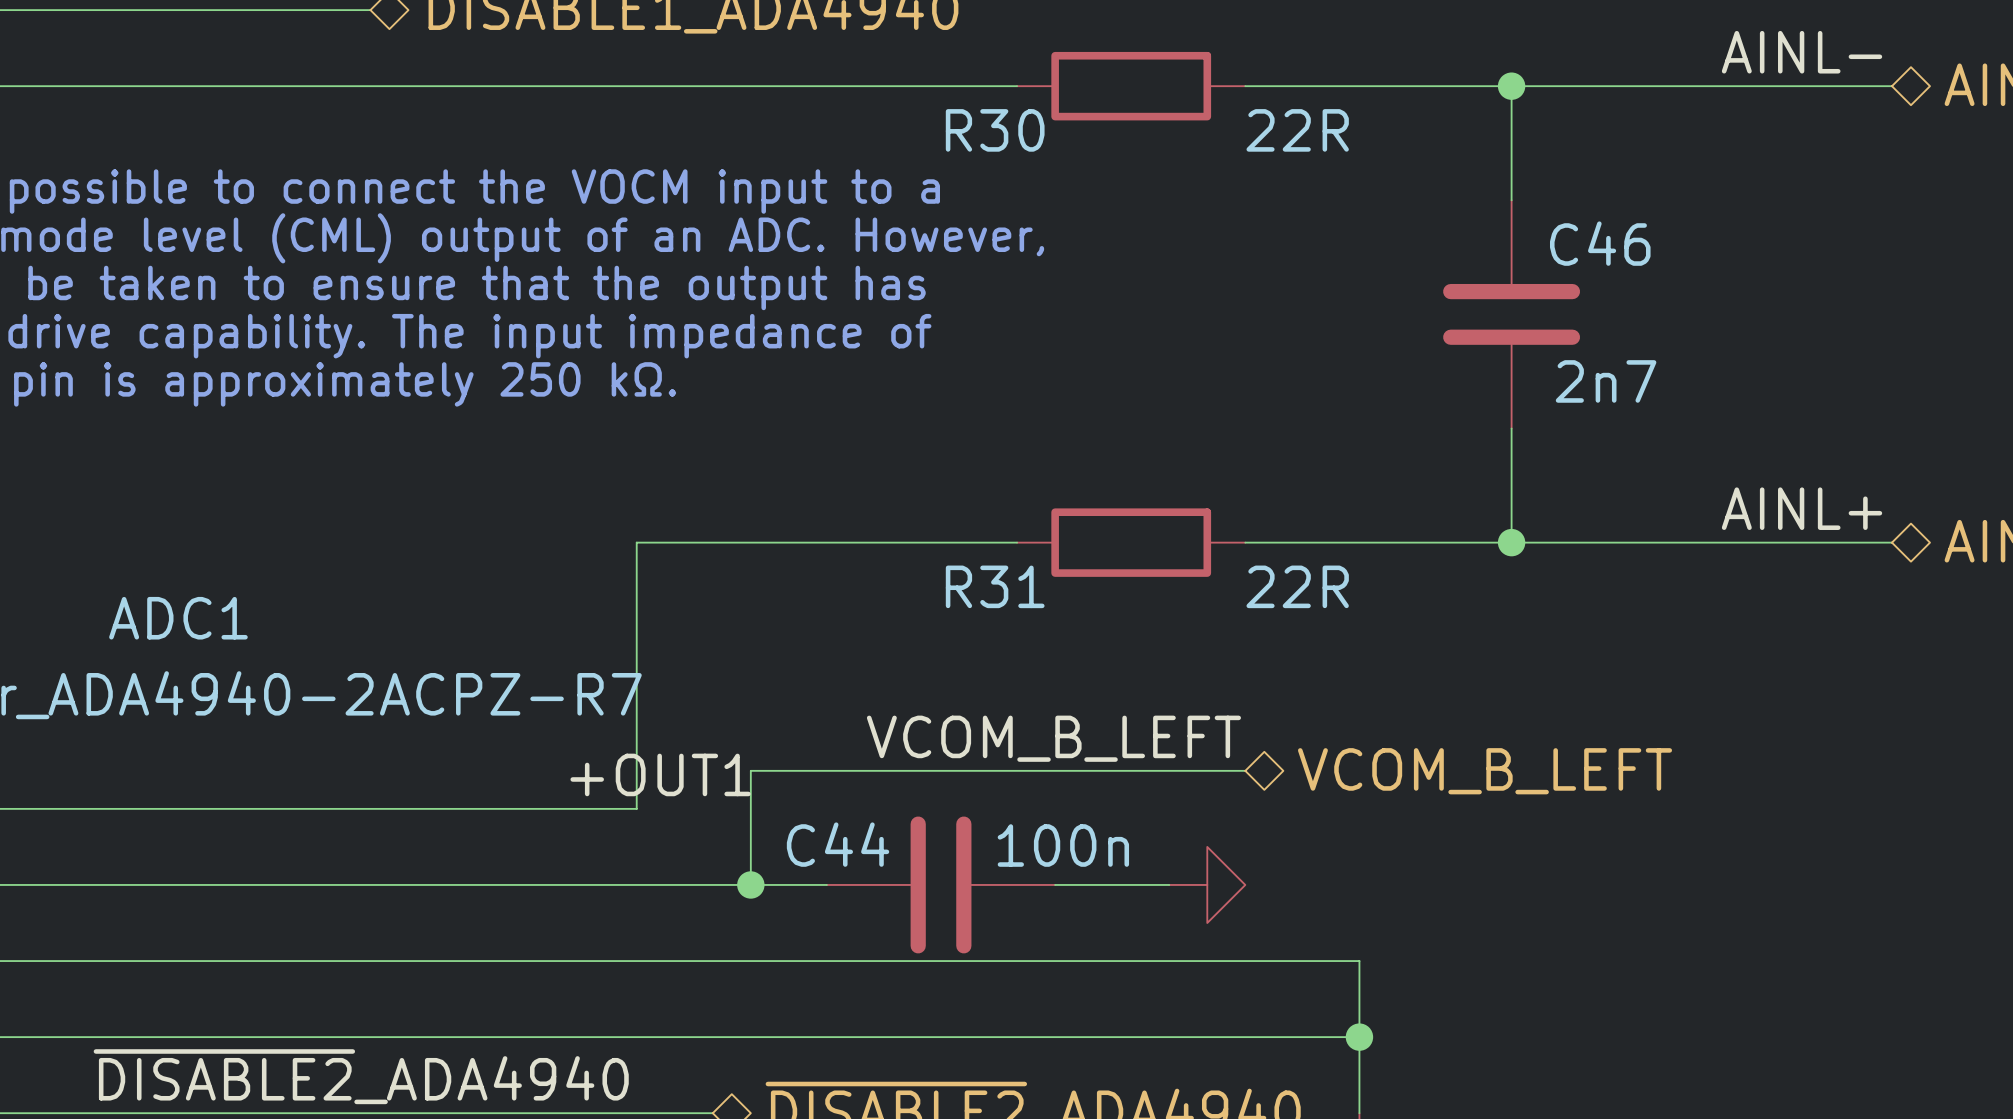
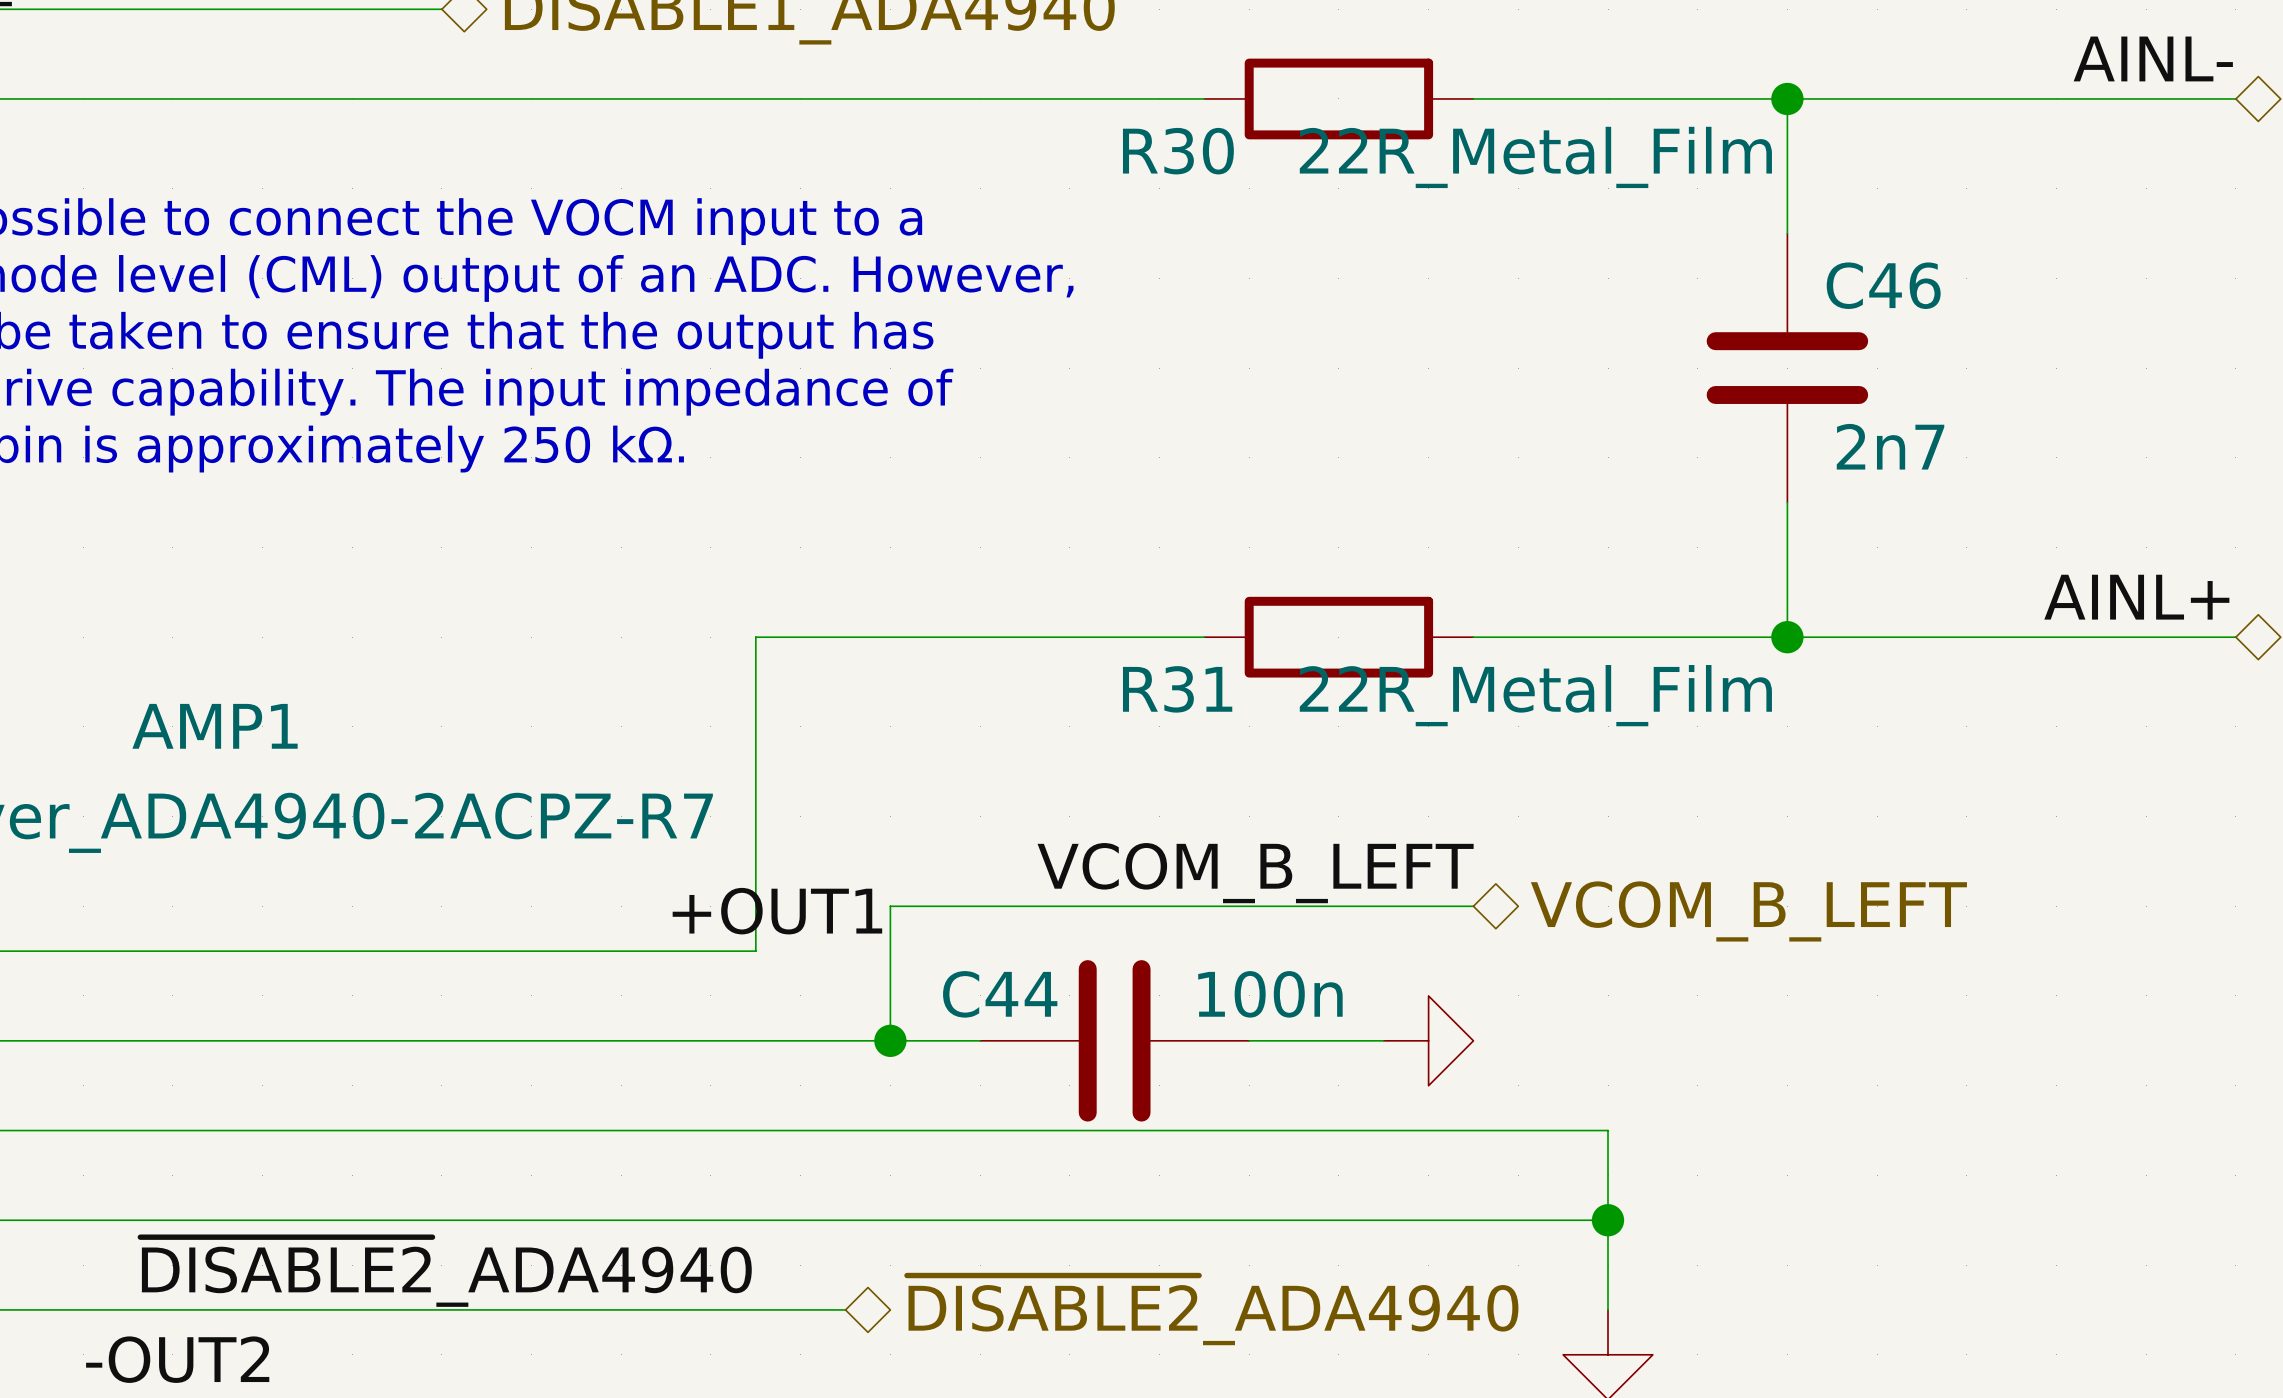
R30 value: 22R (1297, 130) -> 22R_Metal_Film (1535, 157)
R31 value: 22R (1297, 586) -> 22R_Metal_Film (1535, 695)
ADC1 name: ADC1 (178, 618) -> AMP1 (215, 726)

